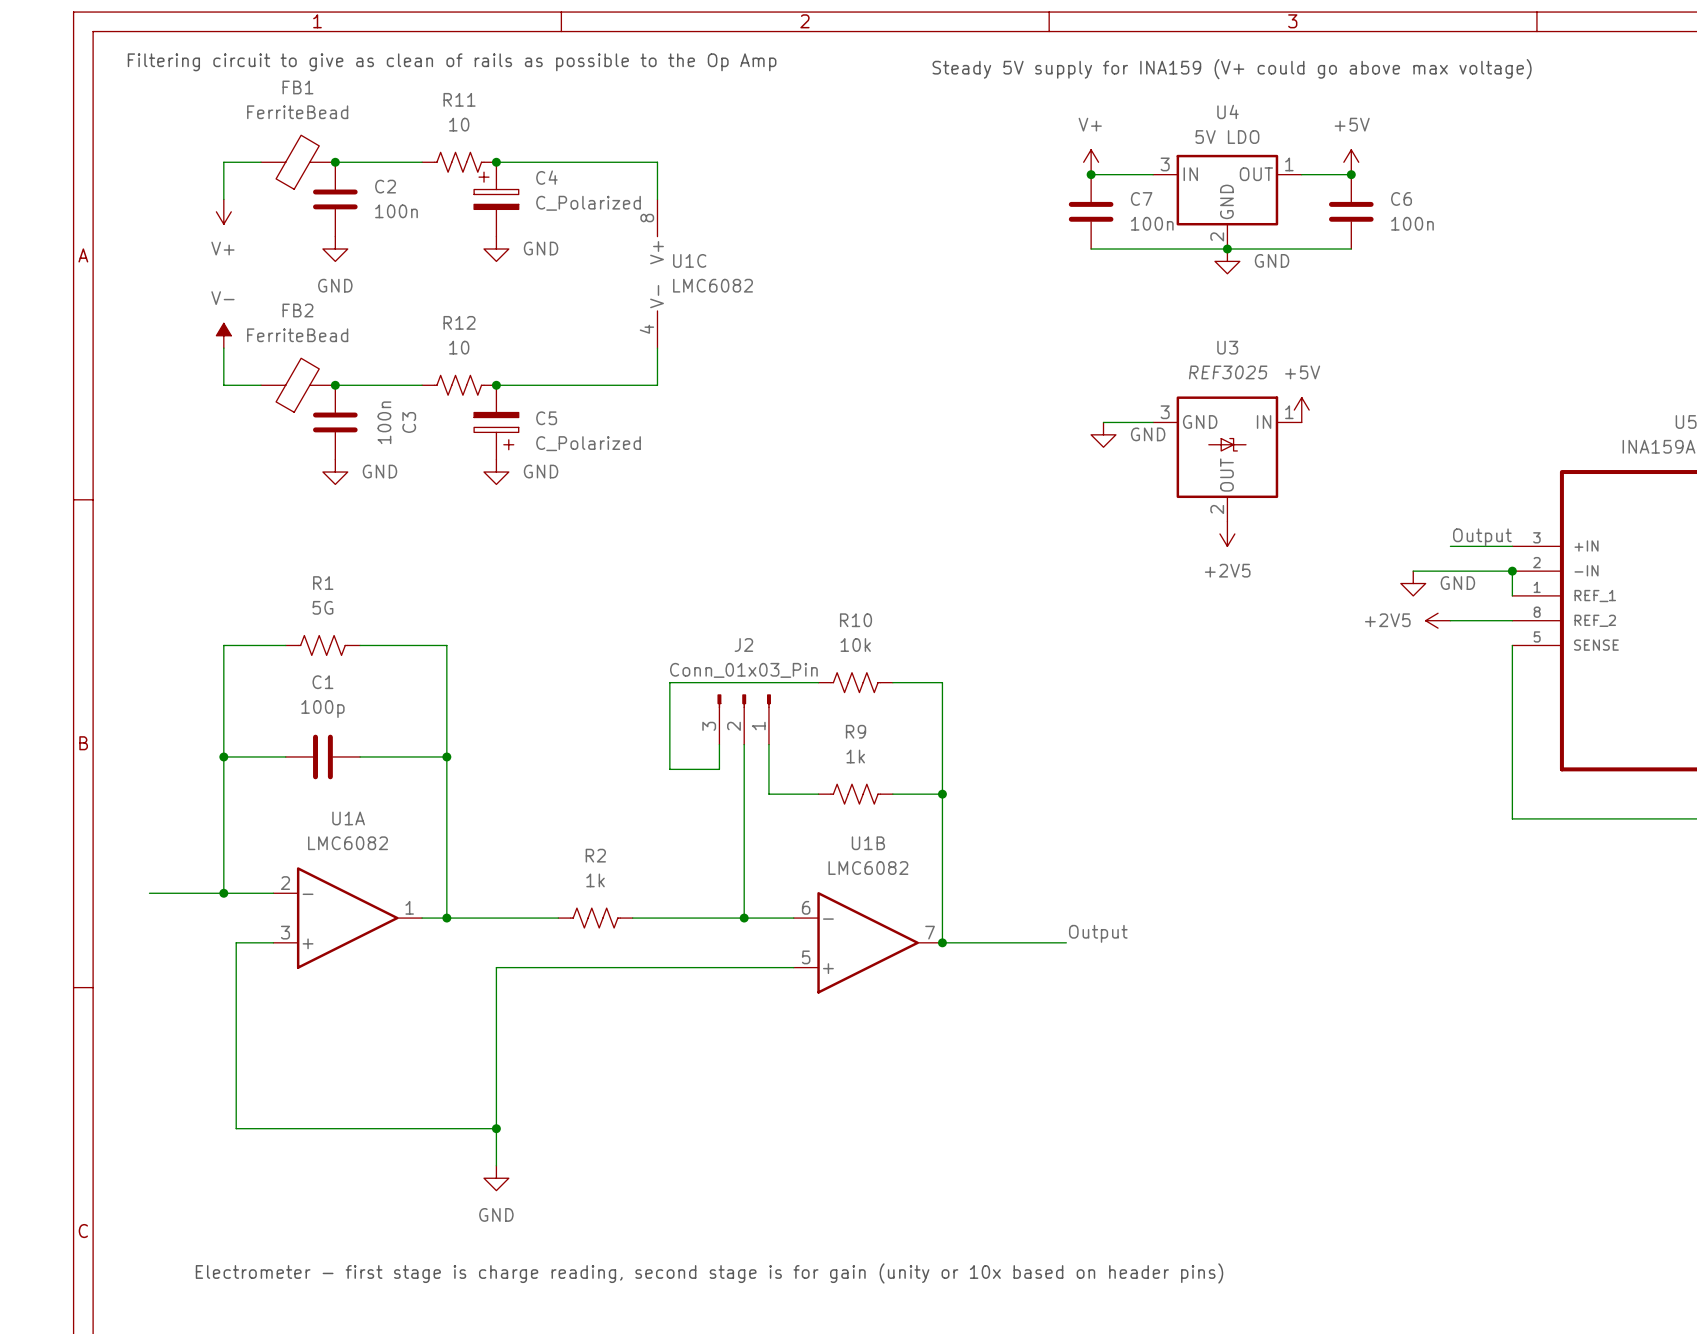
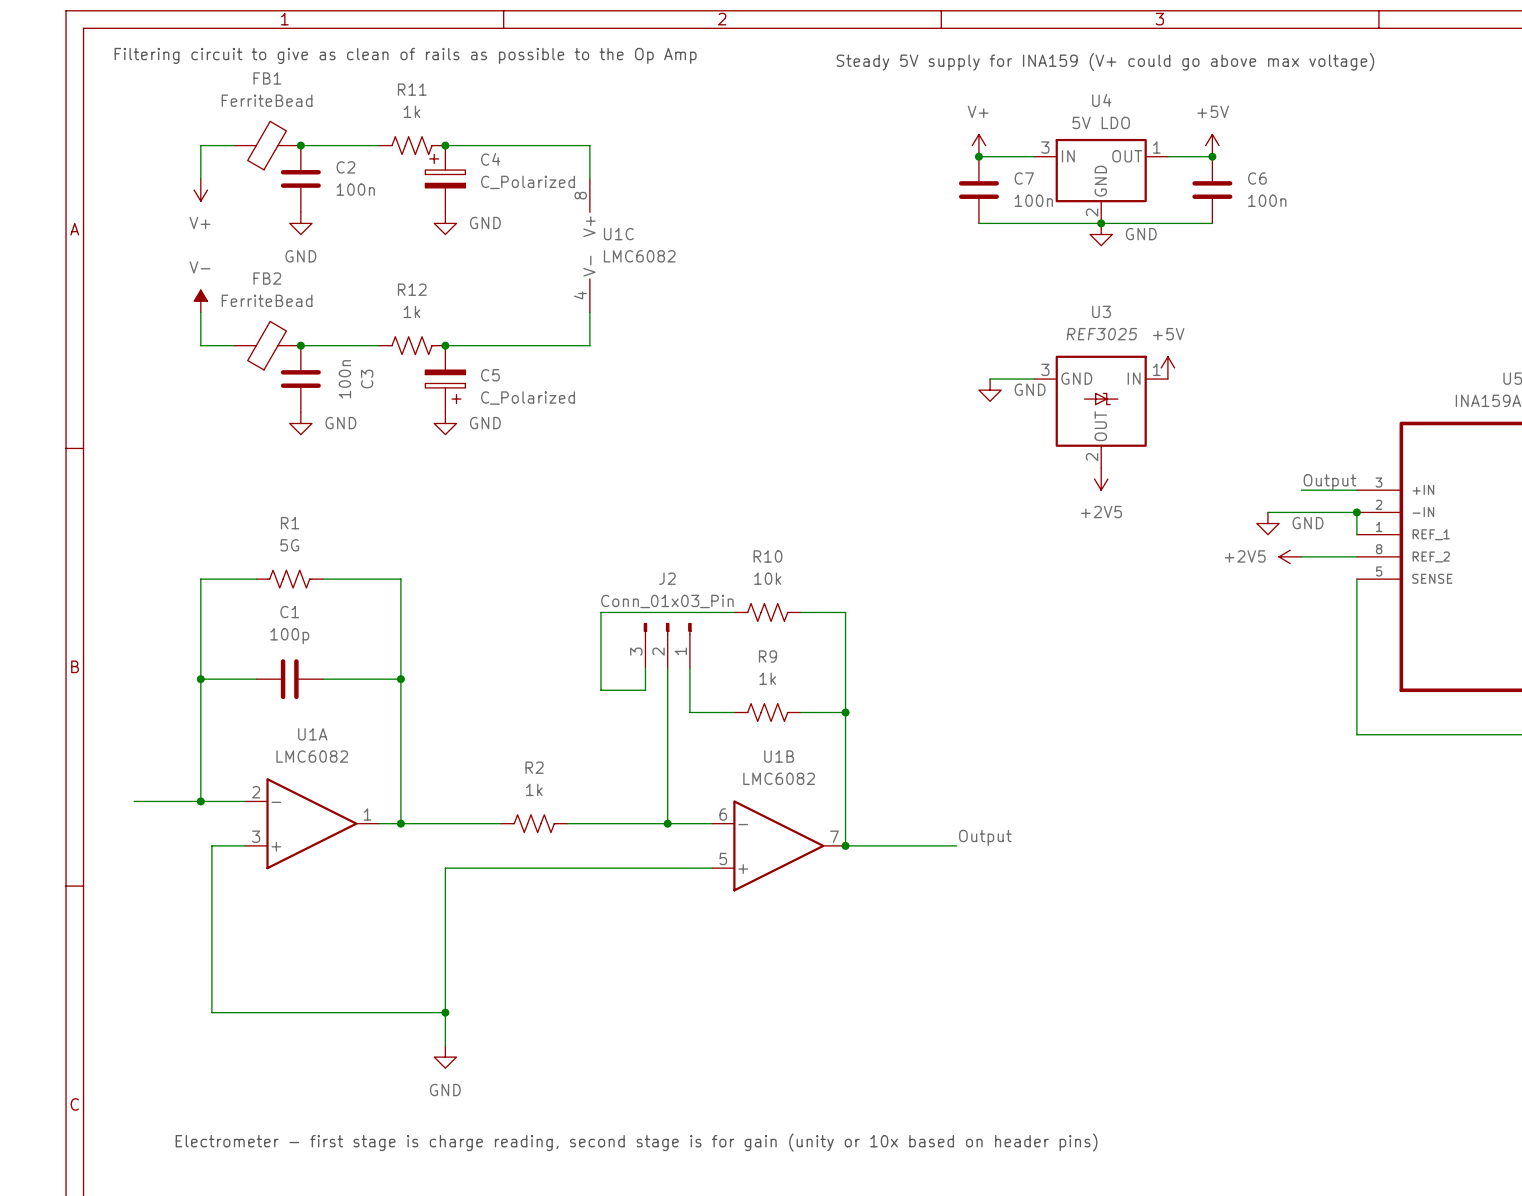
R11 value: 10 (459, 124) -> 1k (412, 111)
R12 value: 10 (459, 347) -> 1k (412, 311)

